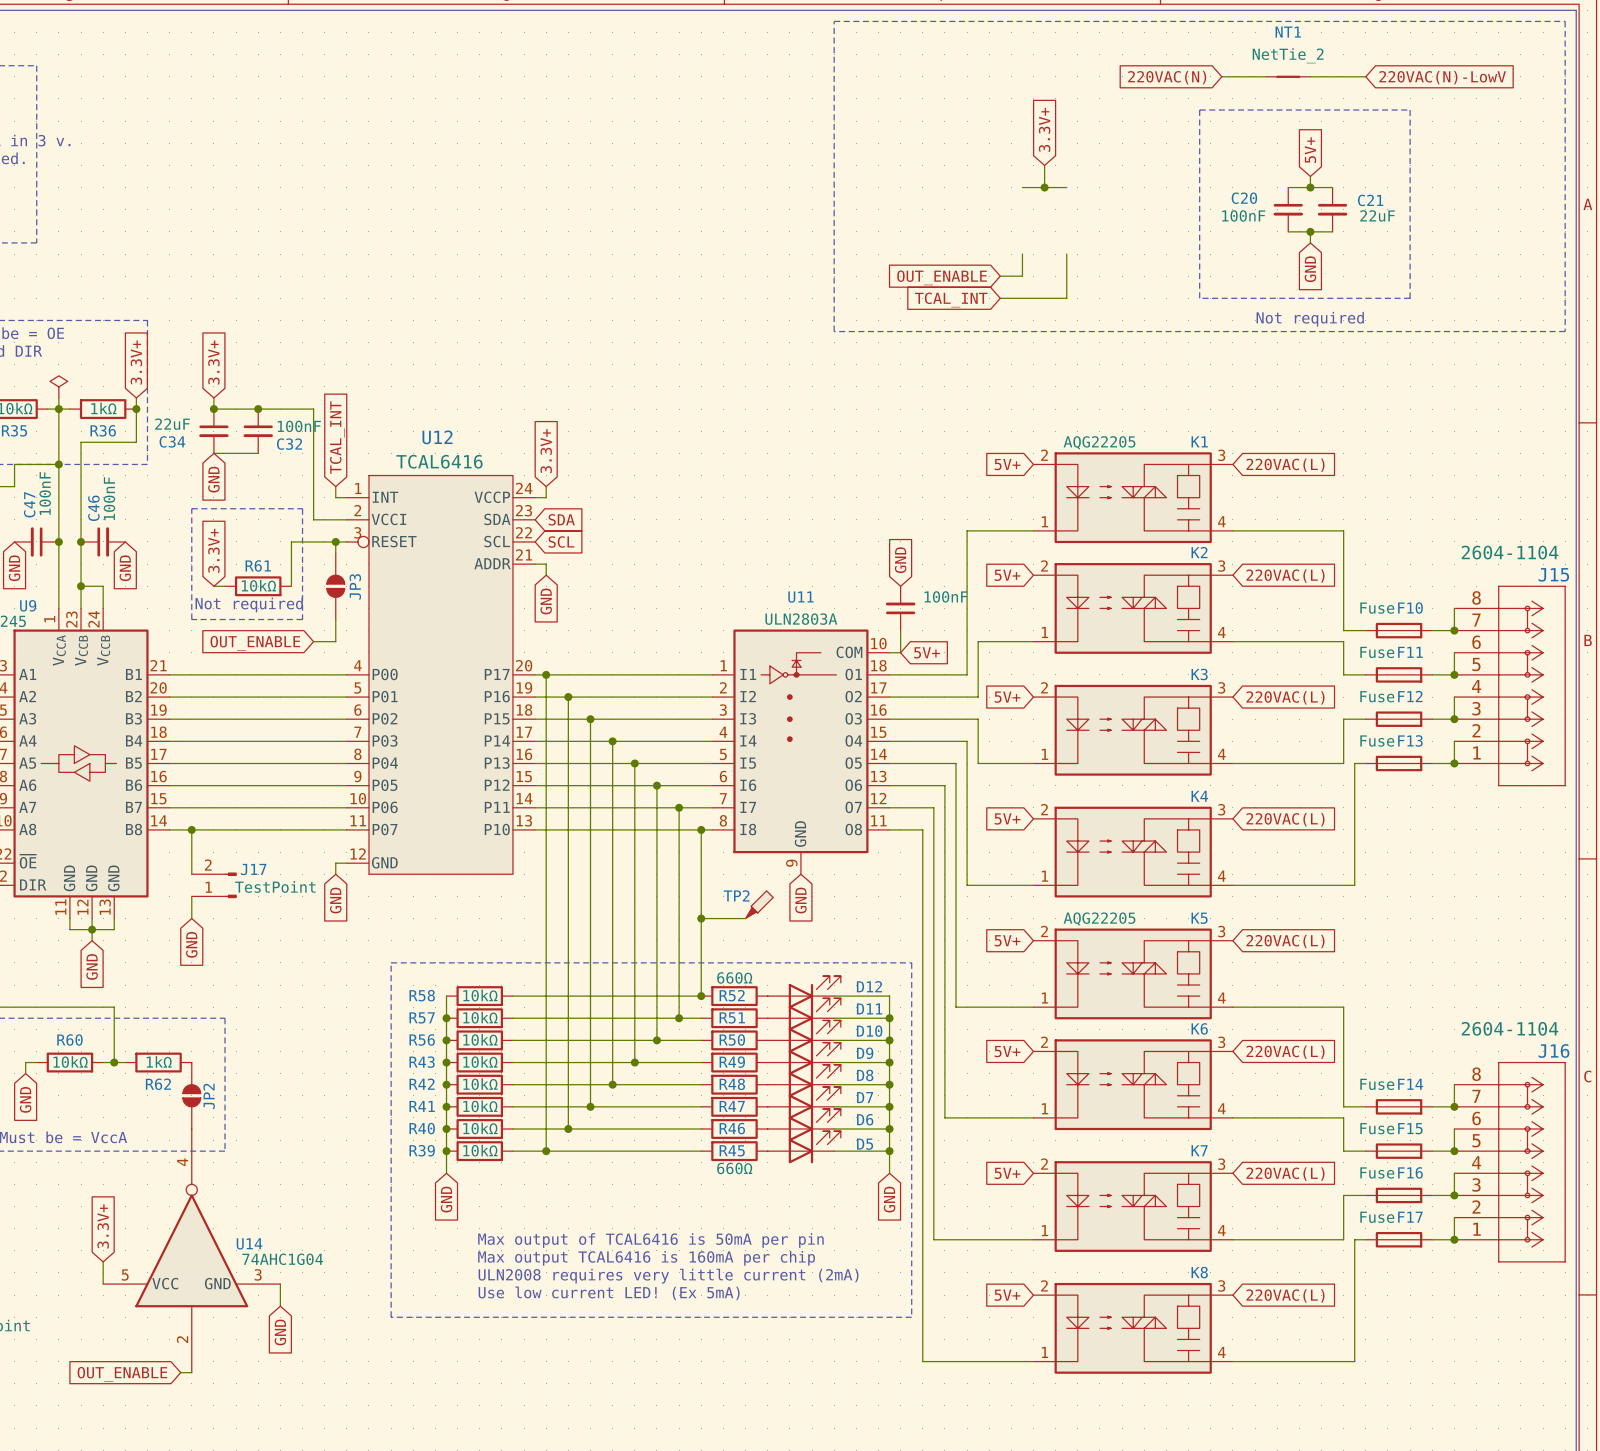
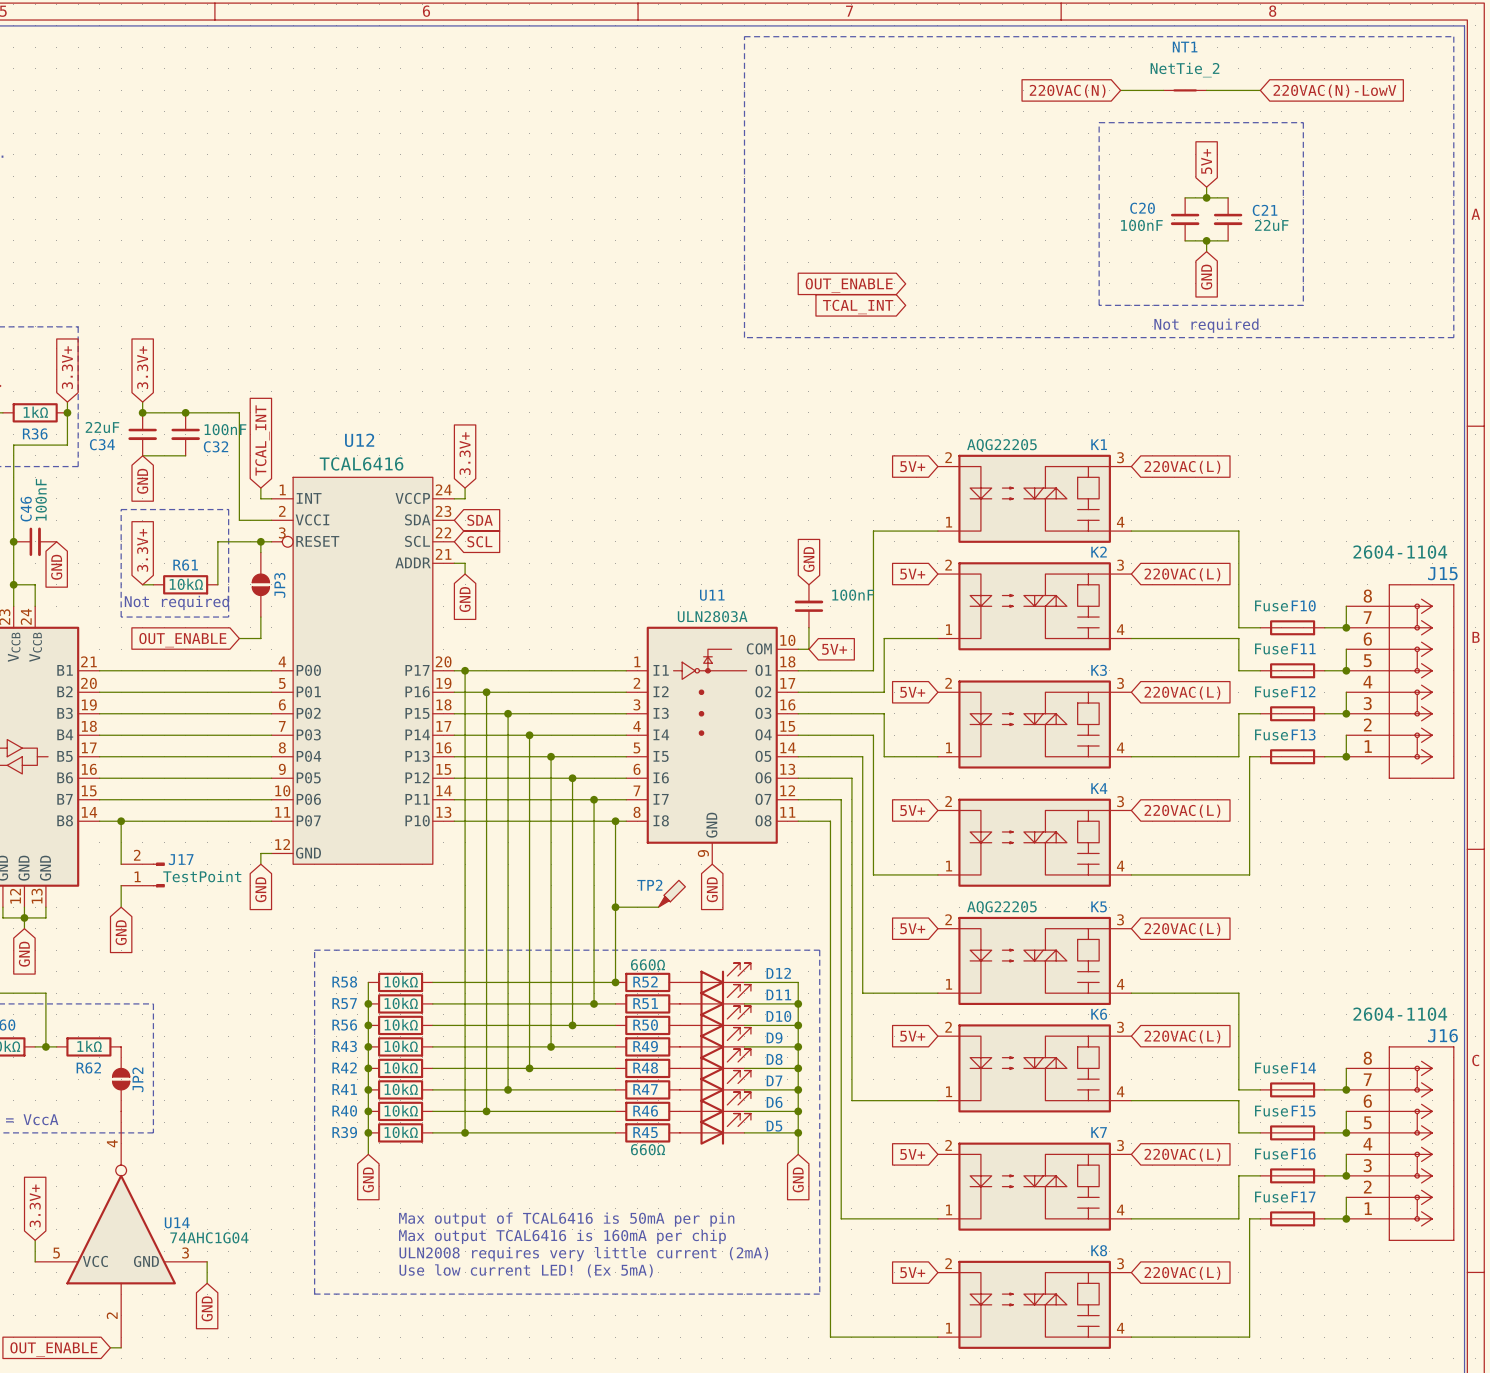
global label: 3.3V+ (1044, 129) -> none
wire: (1044, 165) (1044, 187) -> none
wire: (1022, 187) (1066, 187) -> none
junction: (1044, 187) -> none
wire: (1022, 254) (1022, 276) (1000, 276) -> none
wire: (1066, 254) (1066, 298) (1000, 298) -> none

